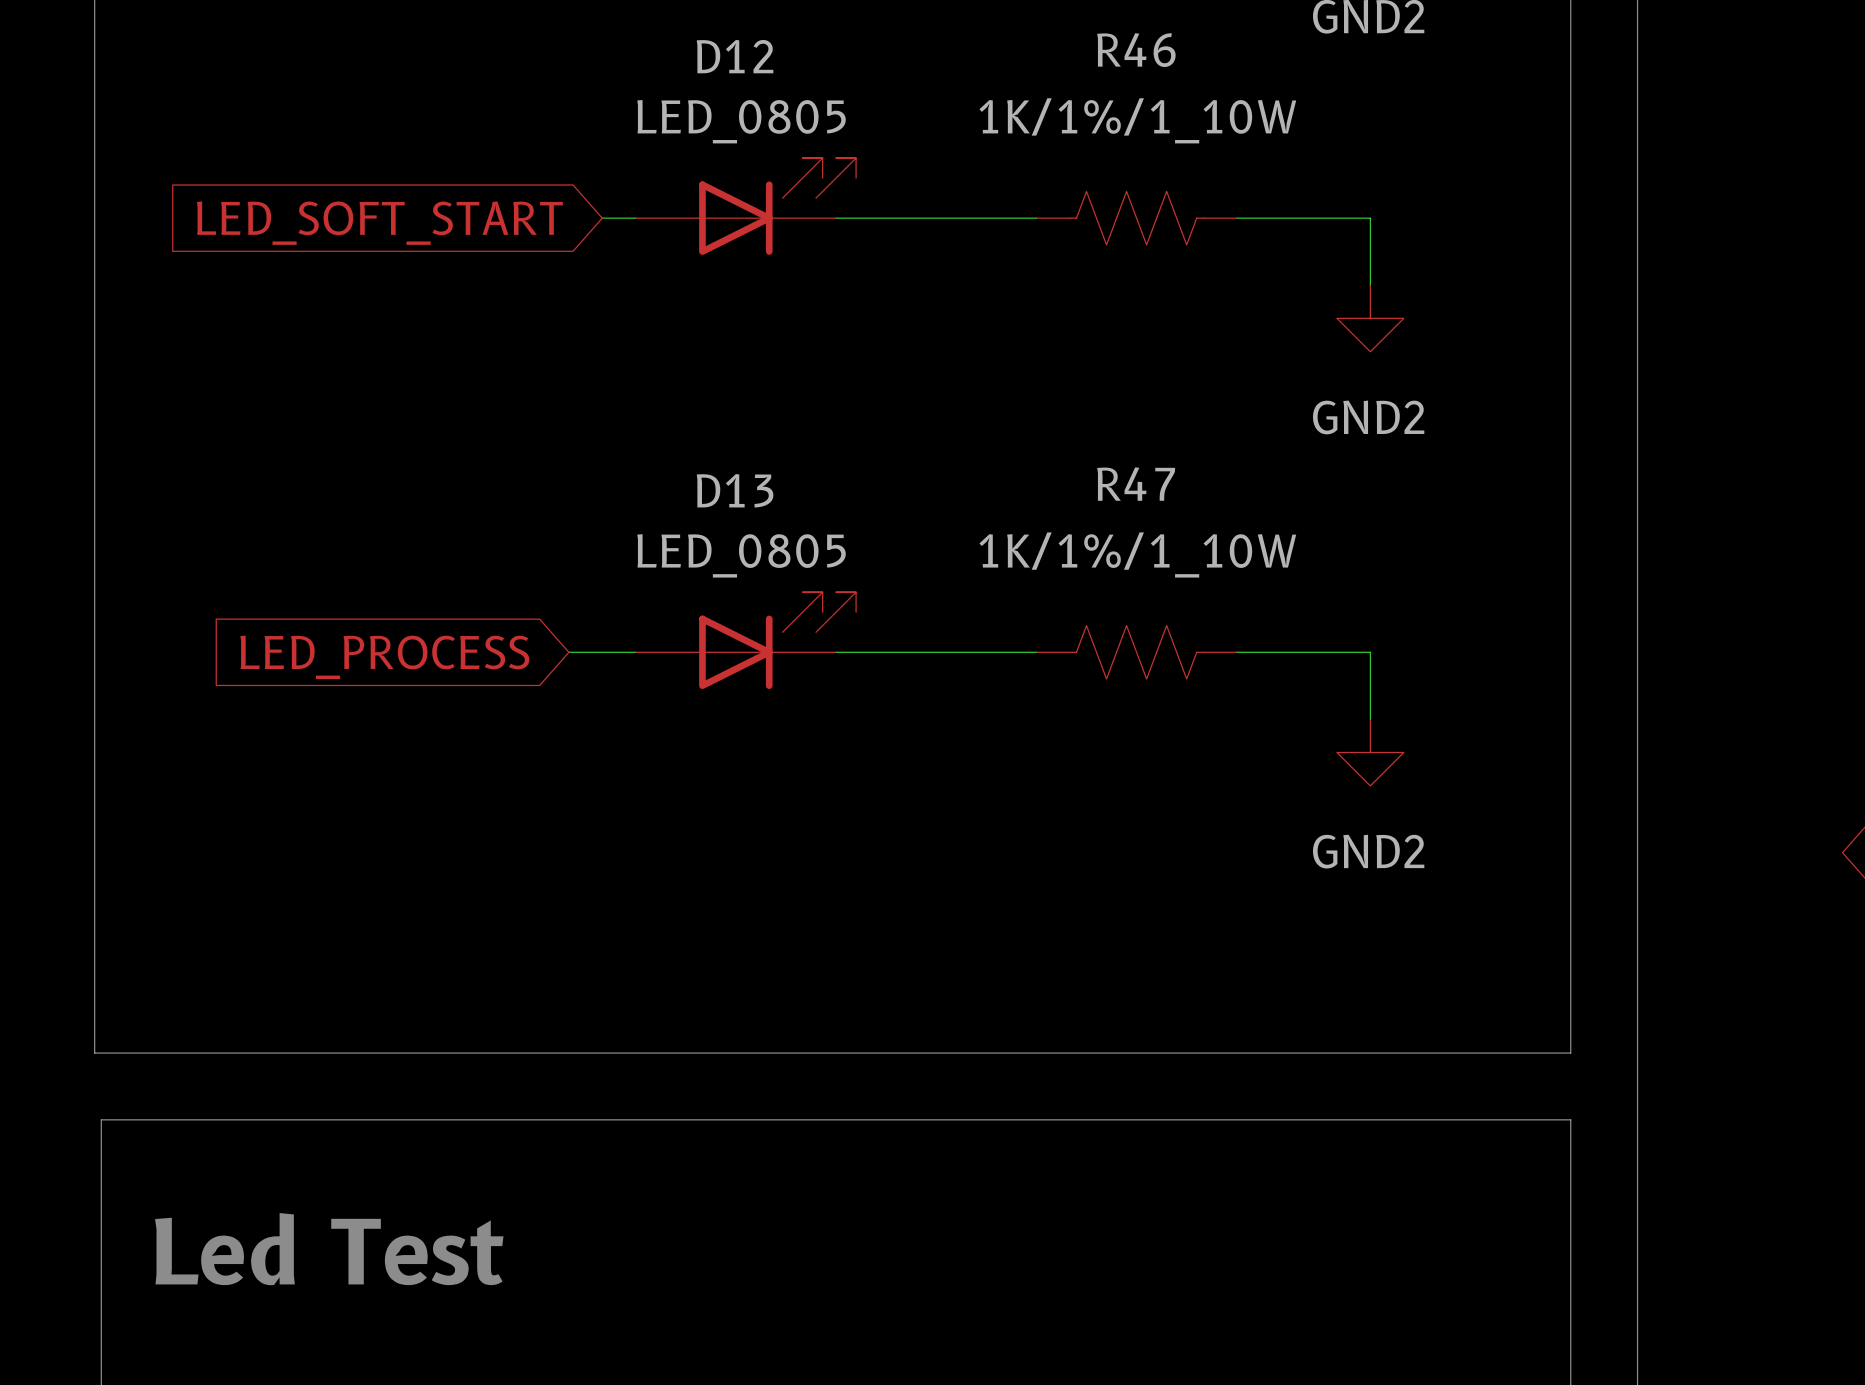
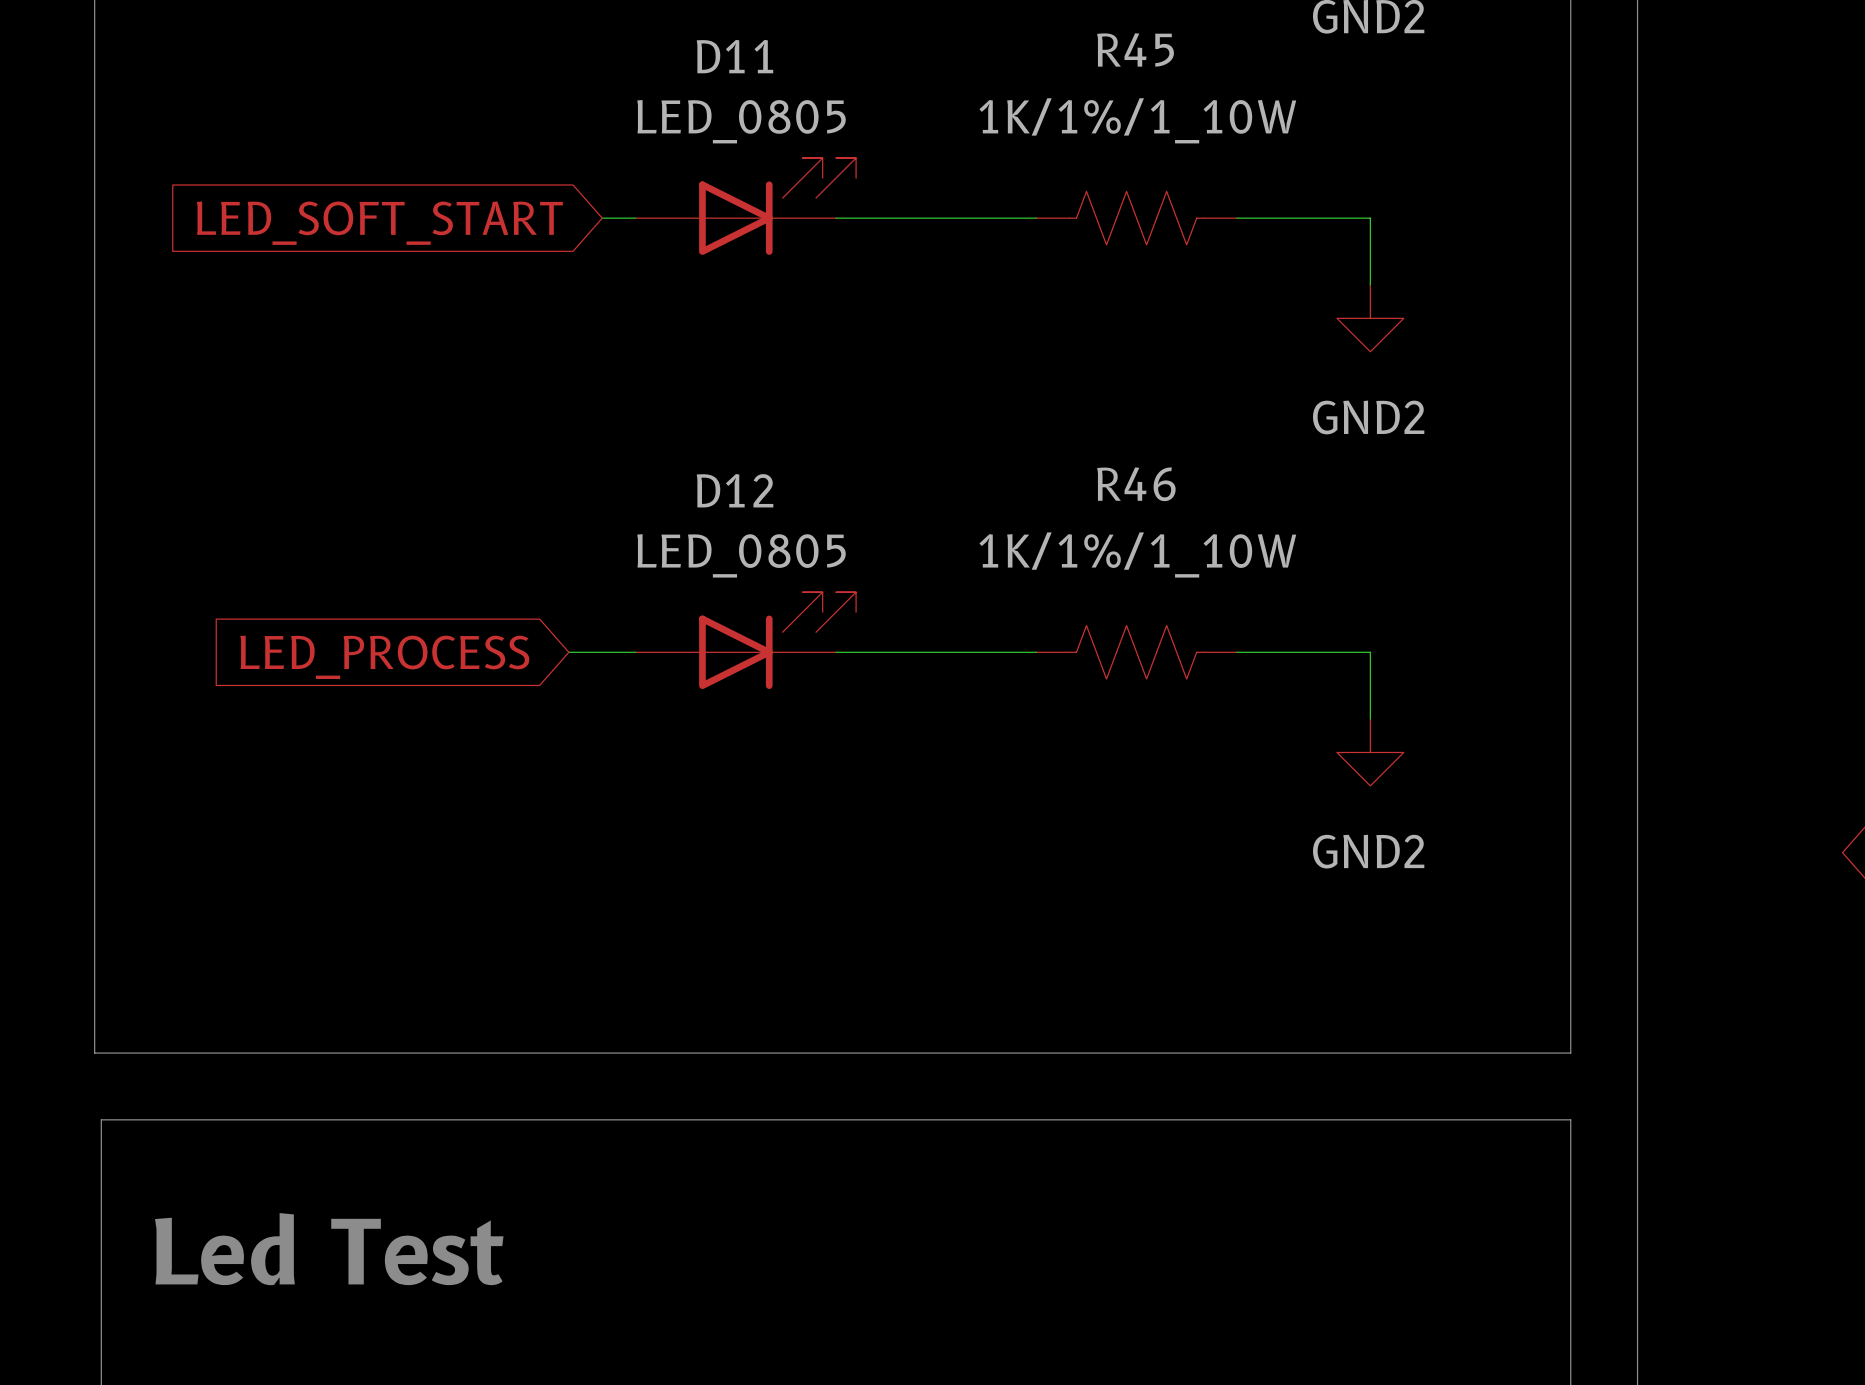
R46 name: R46 (1136, 50) -> R45 (1135, 49)
D12 name: D12 (735, 56) -> D11 (734, 56)
R47 name: R47 (1136, 484) -> R46 (1136, 484)
D13 name: D13 (735, 490) -> D12 (735, 490)

